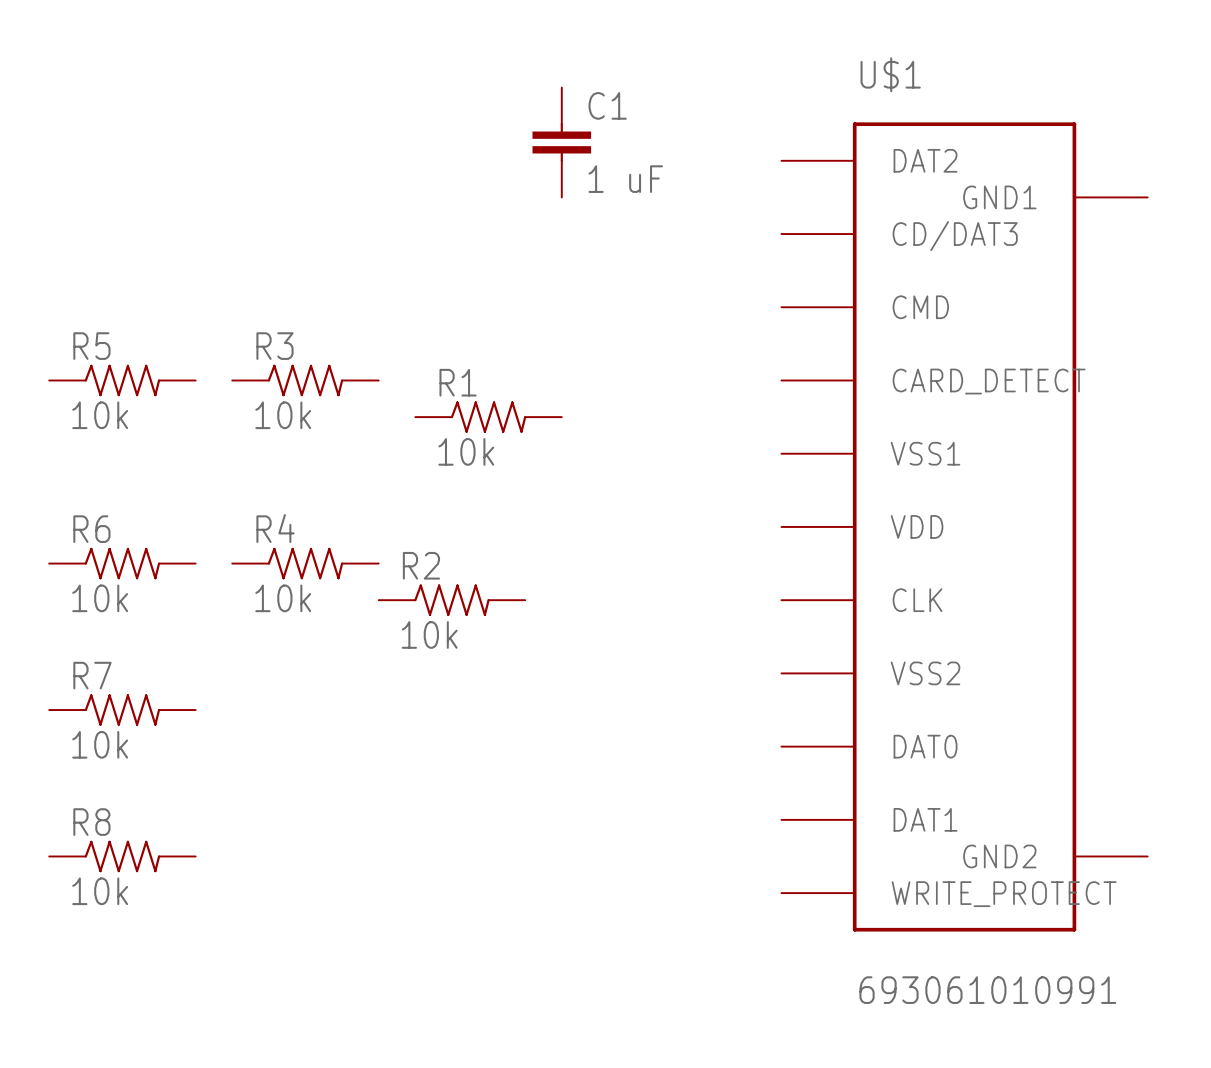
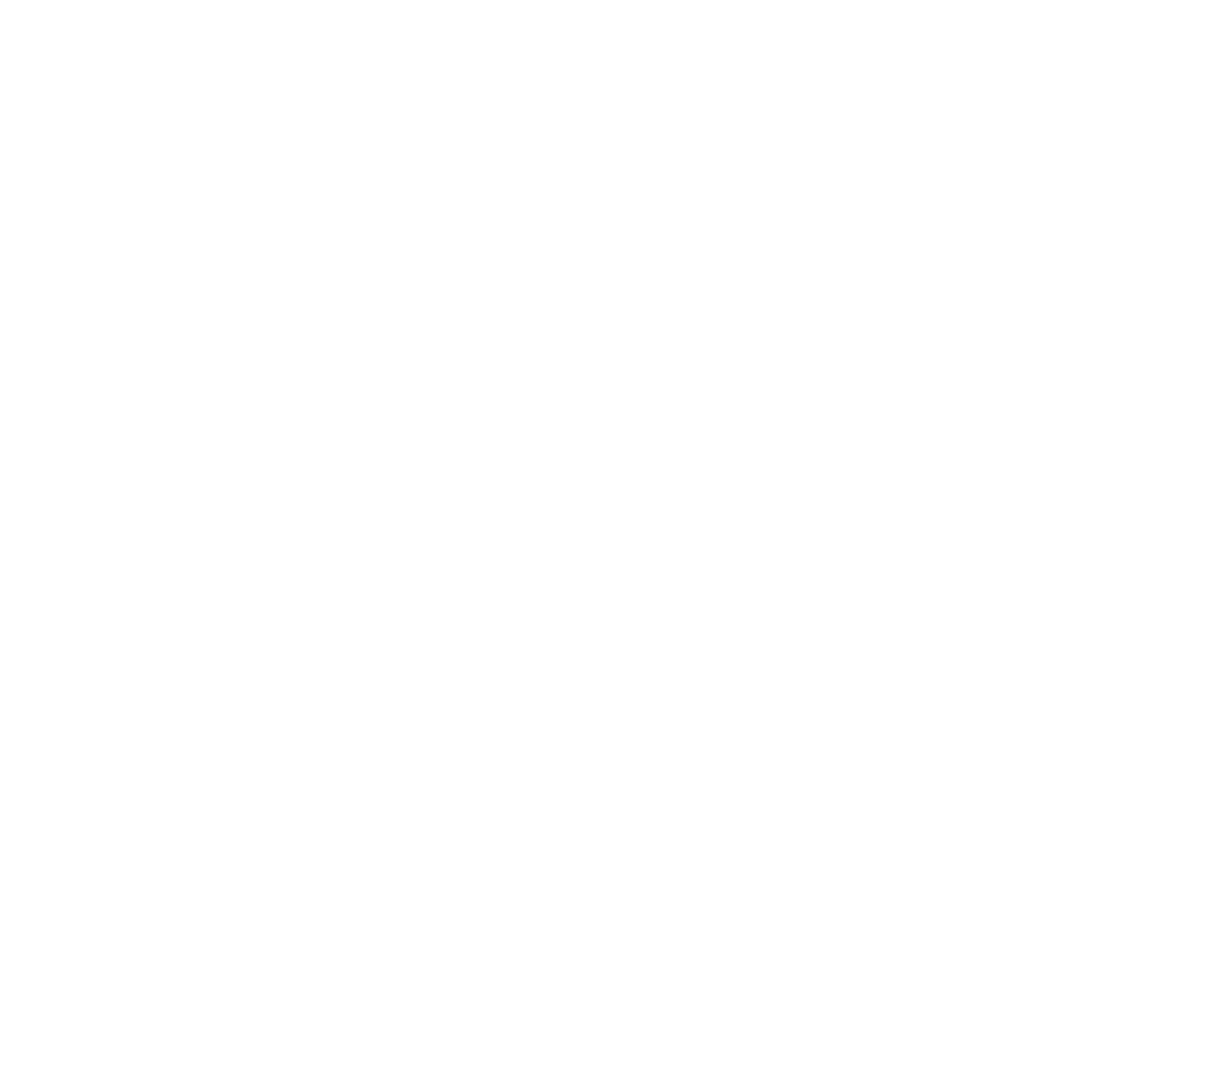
C1: 1 uF (561, 142) -> none
R5: 10k (122, 380) -> none
R3: 10k (305, 380) -> none
R1: 10k (488, 417) -> none
U$1: 693061010991 (964, 526) -> none
R6: 10k (122, 563) -> none
R4: 10k (305, 563) -> none
R2: 10k (451, 600) -> none
R7: 10k (122, 710) -> none
R8: 10k (122, 856) -> none

